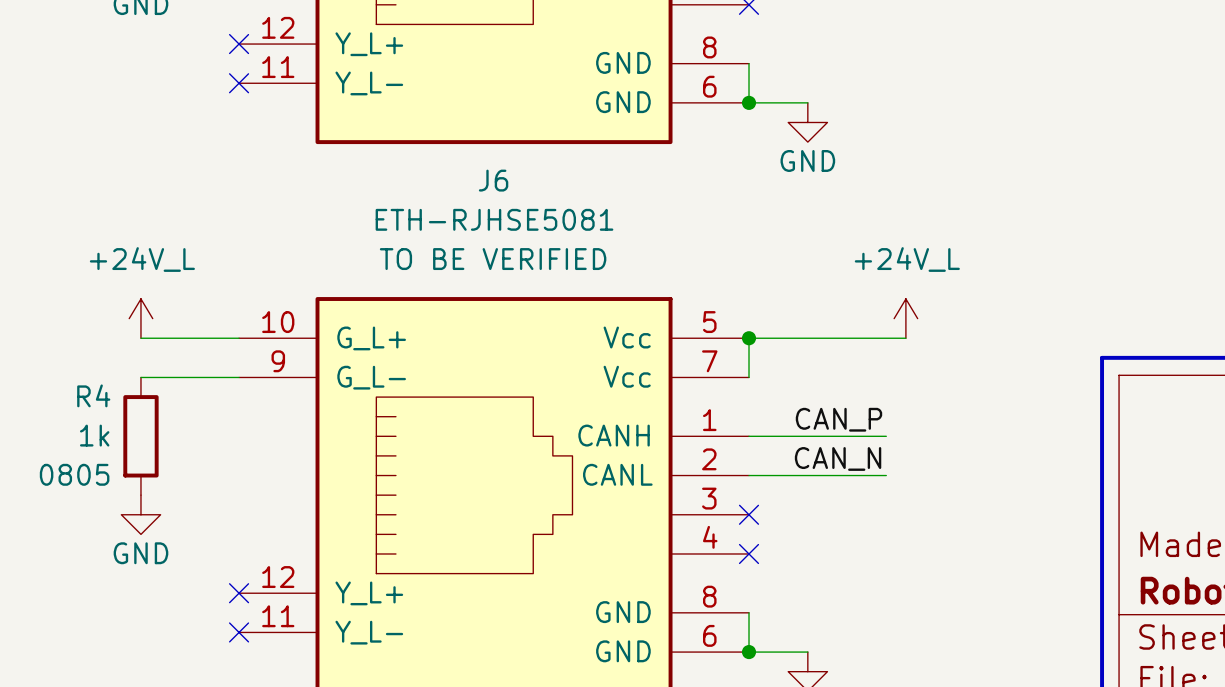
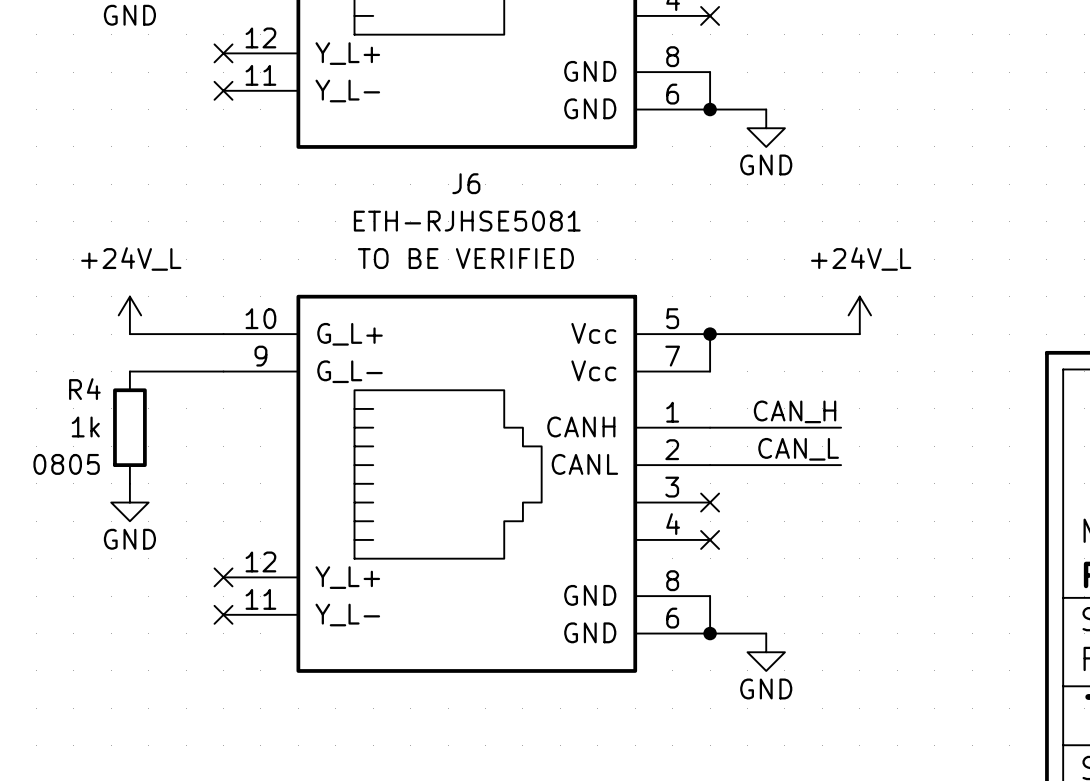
label: CAN_P (838, 419) -> CAN_H (795, 411)
label: CAN_N (838, 458) -> CAN_L (798, 449)

